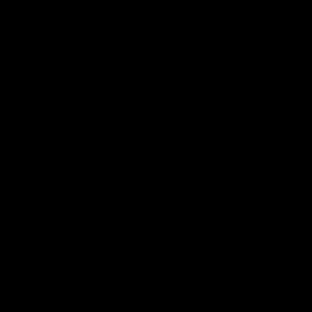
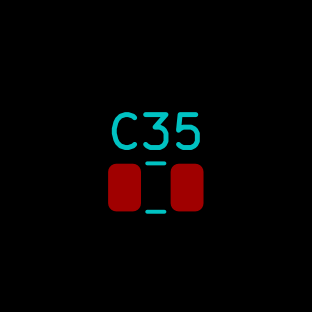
C35: none -> (155, 187)

